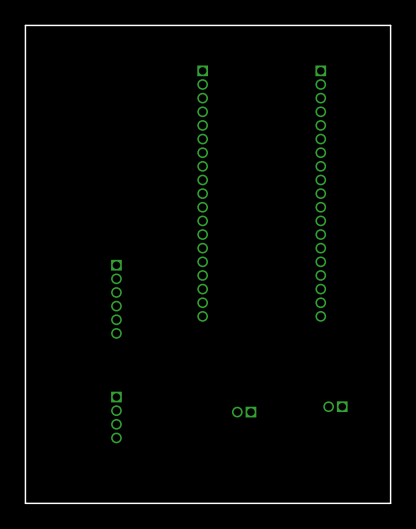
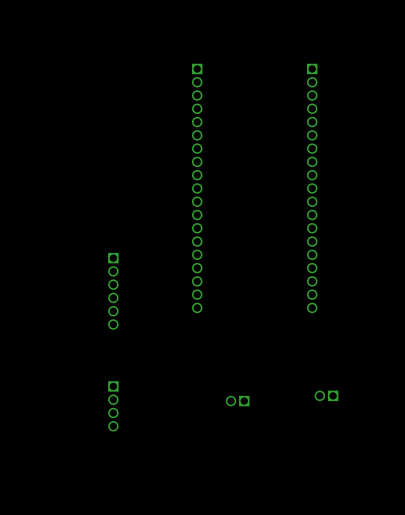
board edge: (390, 25) (25, 25) (25, 503) (390, 503) (390, 25) -> none

